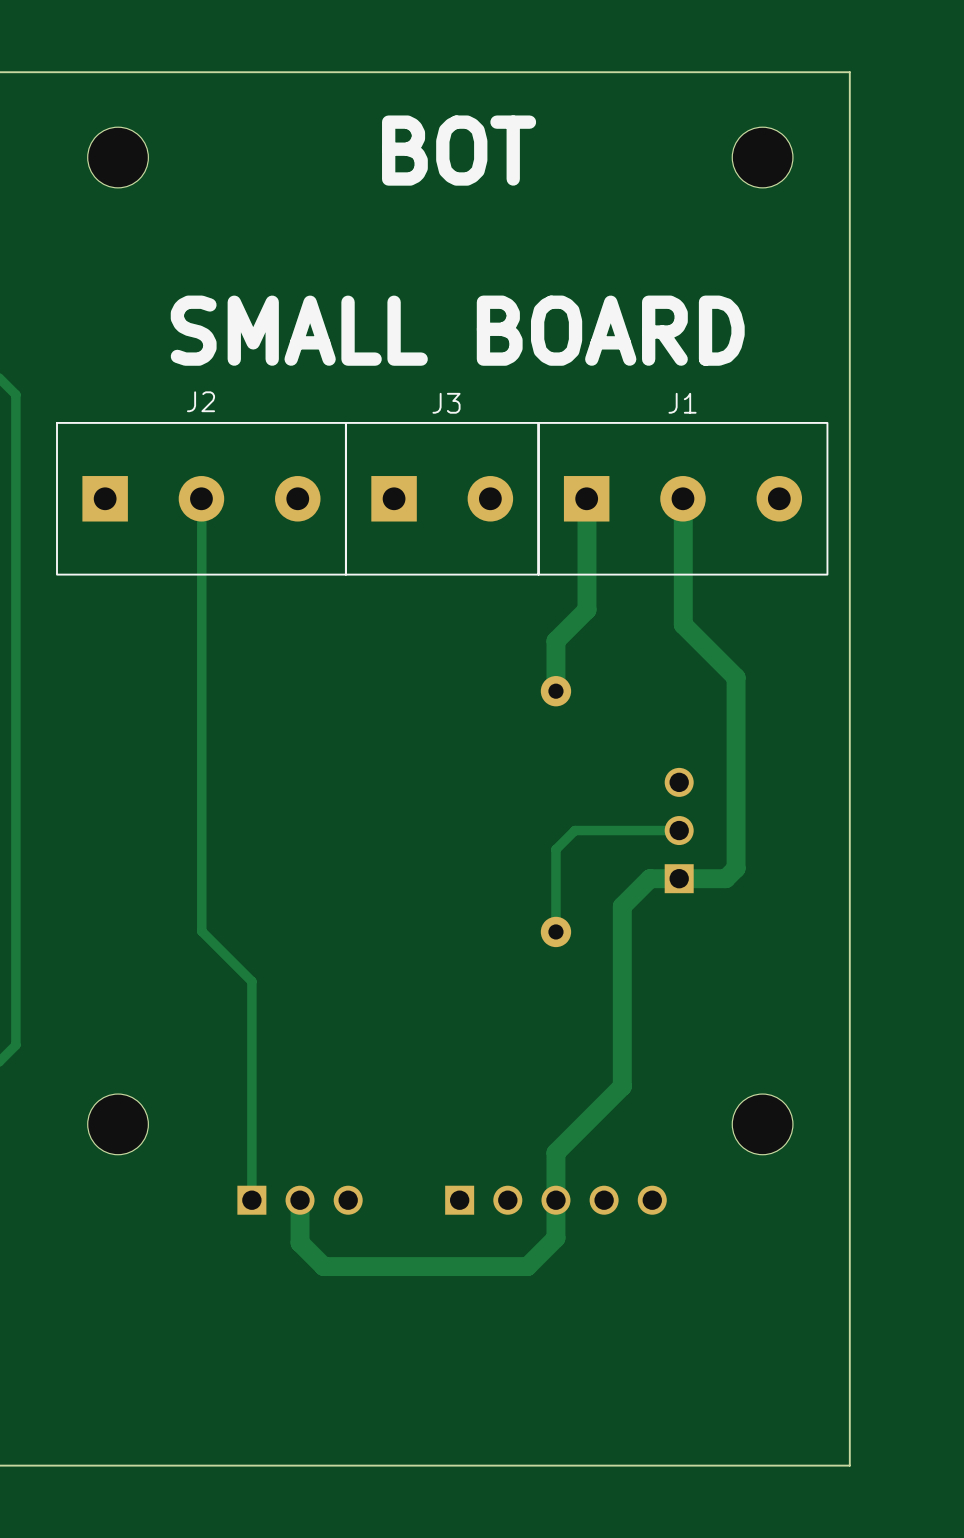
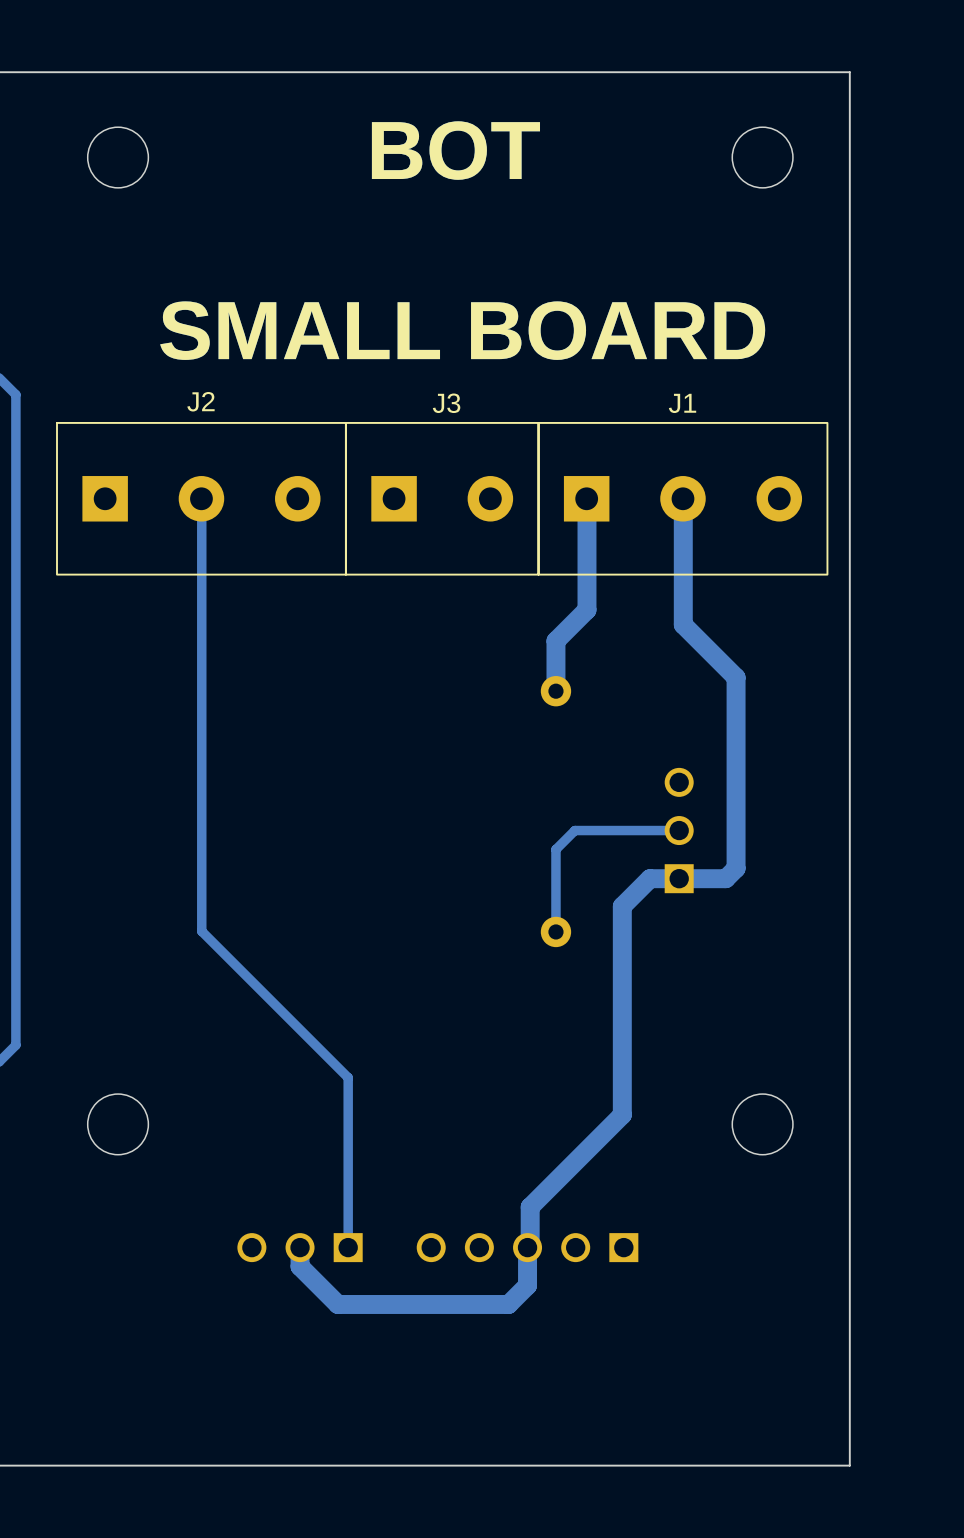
track: (251, 981) (251, 1200) -> (251, 981) (348, 1077) (348, 1247)
track: (622, 1086) (555, 1152) (555, 1238) (527, 1266) (323, 1266) (300, 1242) (300, 1200) -> (622, 1086) (622, 1114) (530, 1207) (530, 1249)
part rotation: 0° (300, 1200) -> 180° (300, 1247)
part rotation: 0° (555, 1200) -> 180° (527, 1247)
track: none -> (527, 1247) (527, 1285) (508, 1304) (337, 1304) (300, 1266) (300, 1247)

